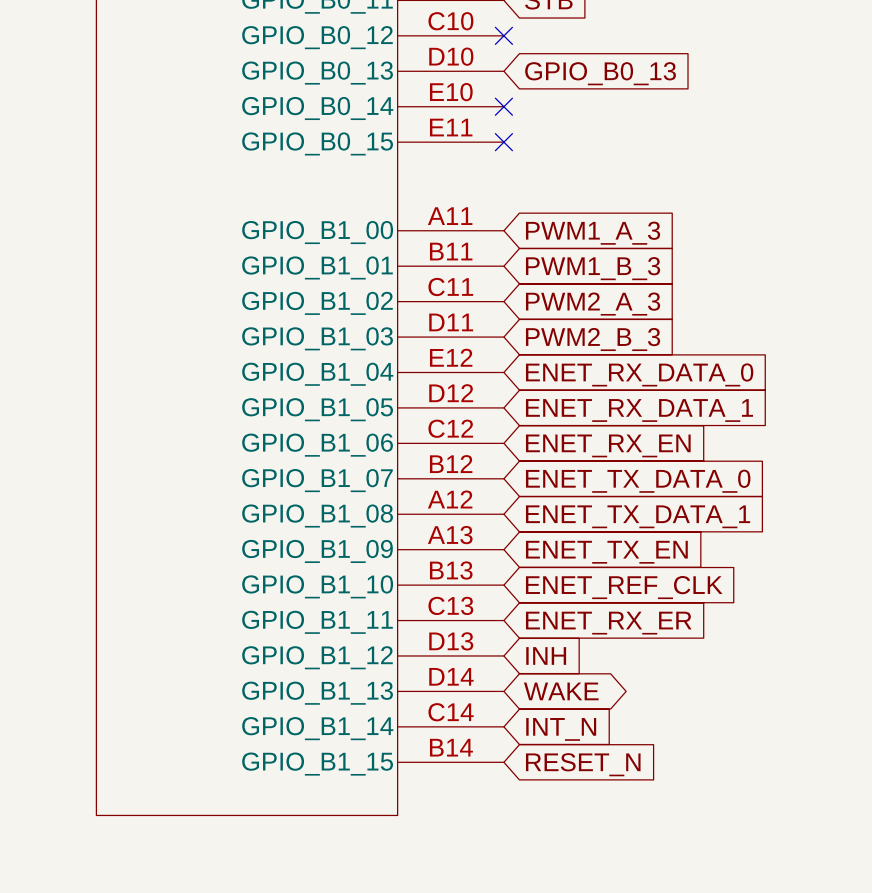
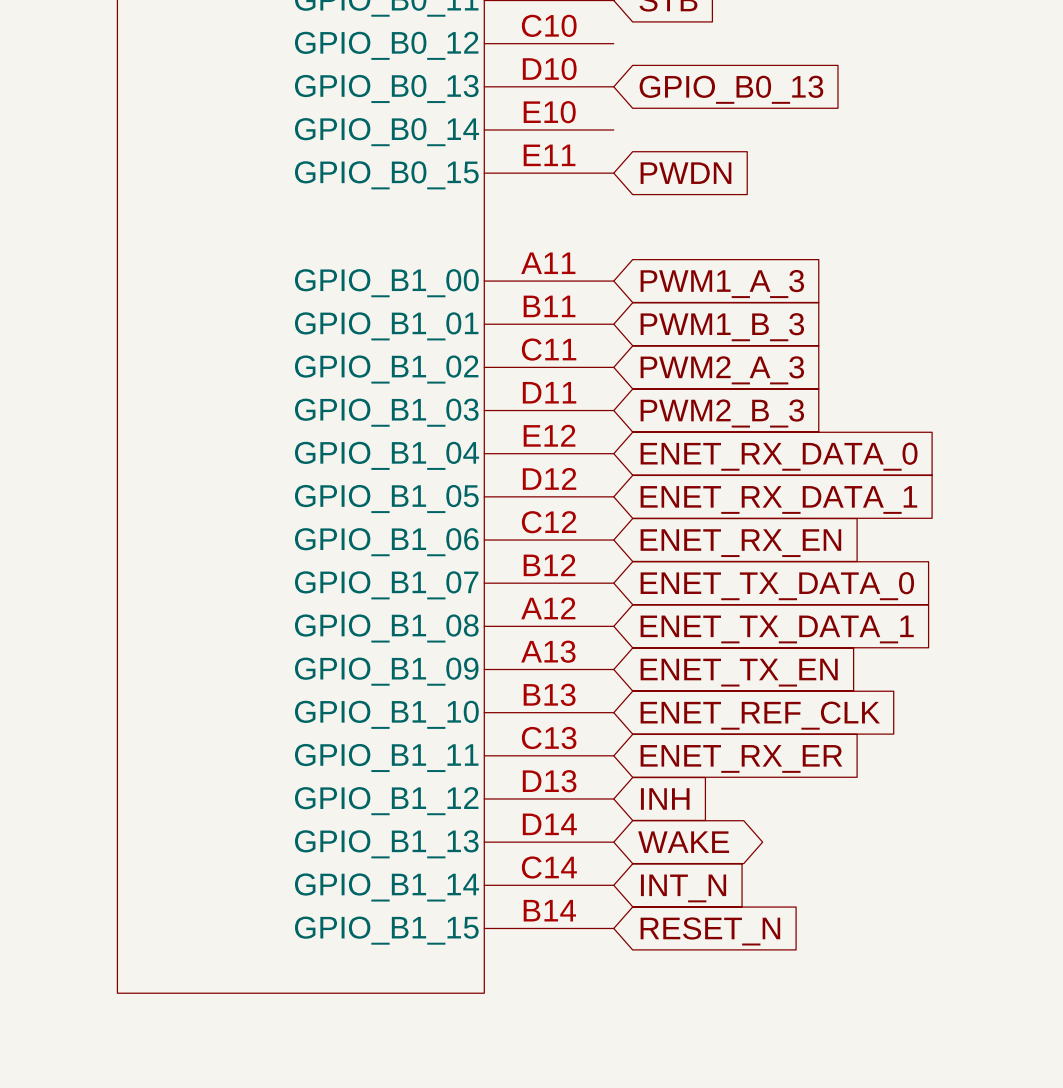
no-connect mark: (503, 35) -> none
no-connect mark: (503, 106) -> none
no-connect mark: (503, 142) -> none
global label: none -> PWDN (685, 173)

